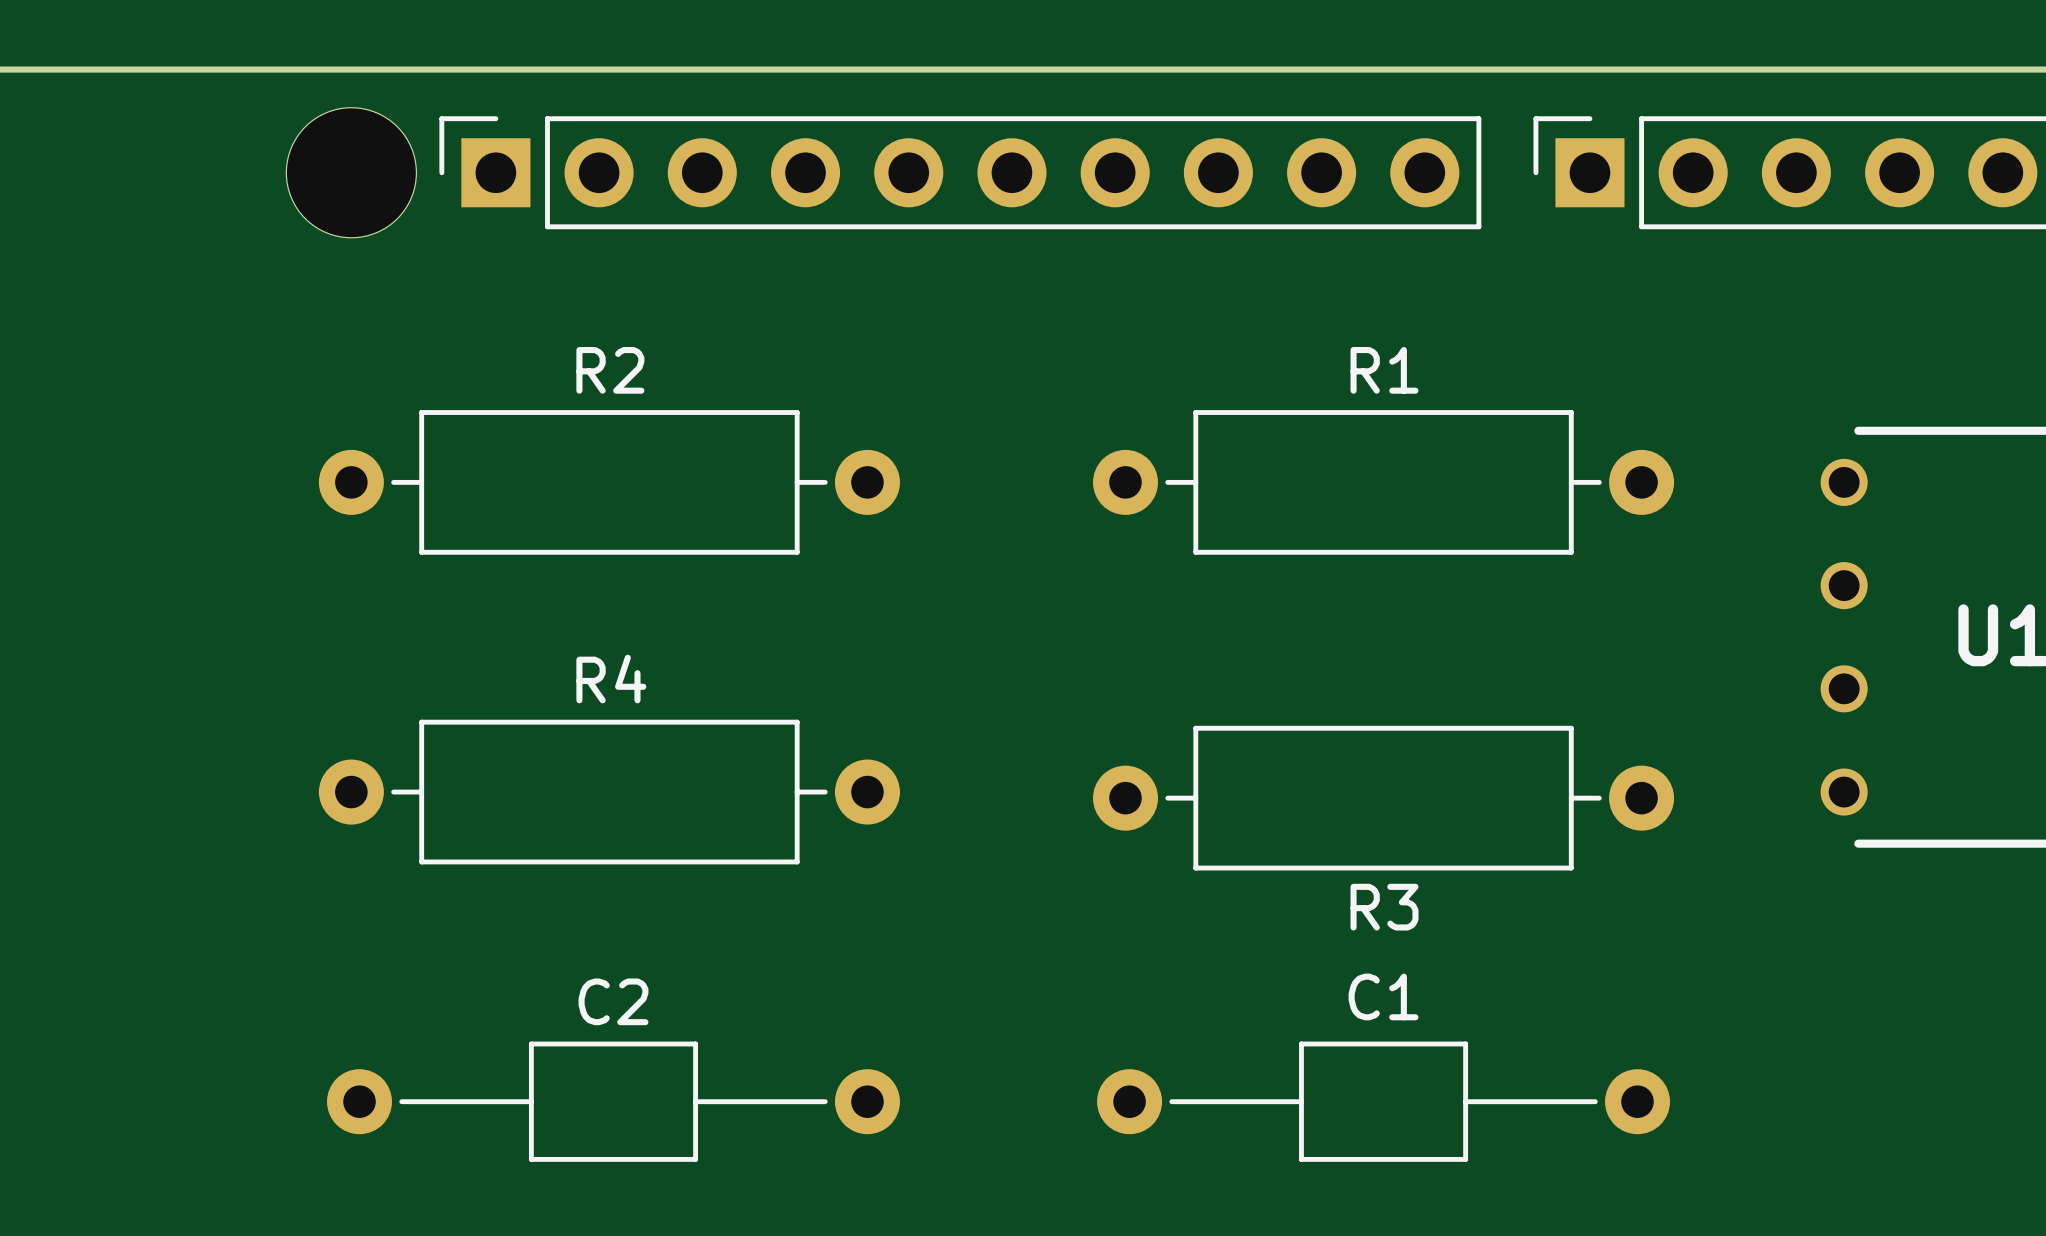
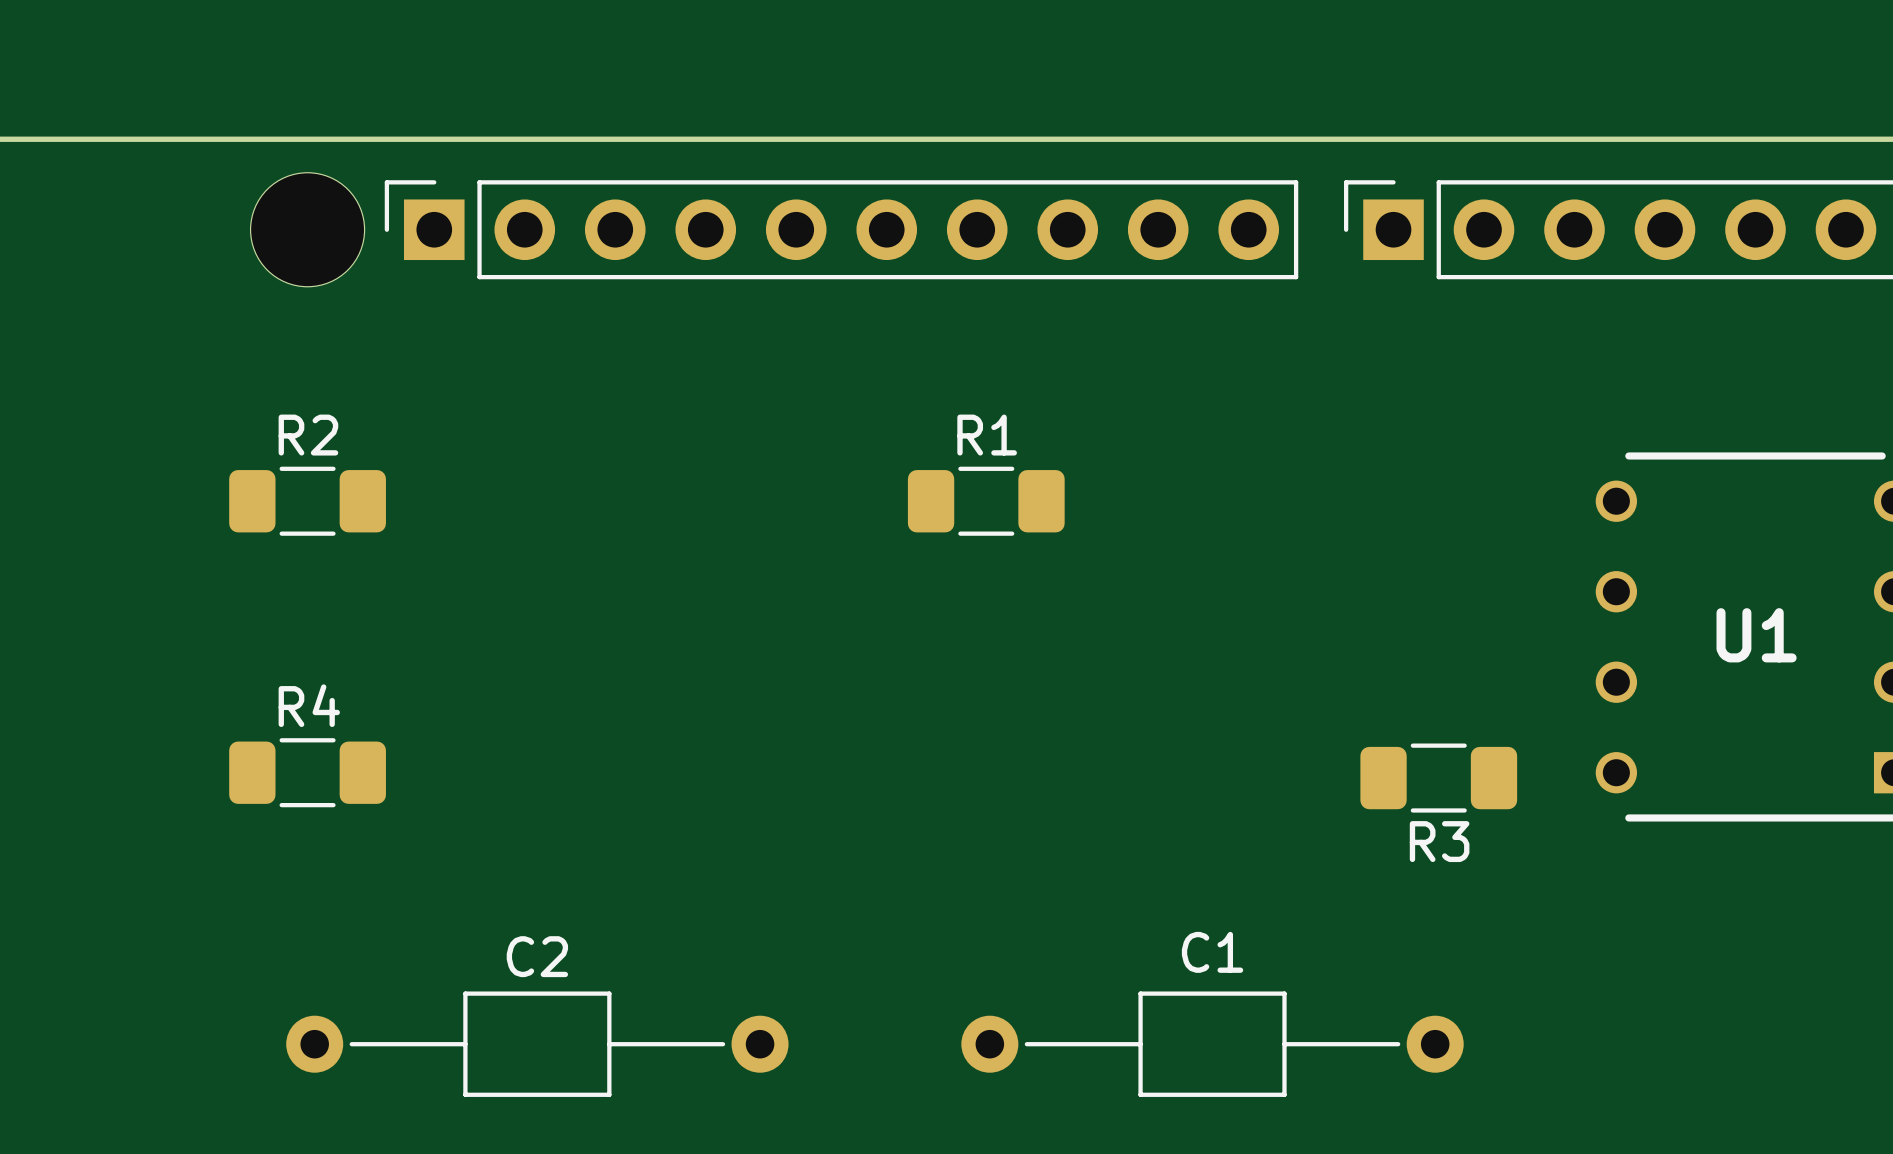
R2 footprint: [318, 410, 900, 555] -> [229, 466, 386, 536]
R1 footprint: [1092, 410, 1675, 555] -> [907, 466, 1065, 536]
R4 footprint: [318, 719, 900, 865] -> [229, 738, 386, 808]
R3 footprint: [1092, 725, 1675, 871] -> [1360, 743, 1518, 813]

